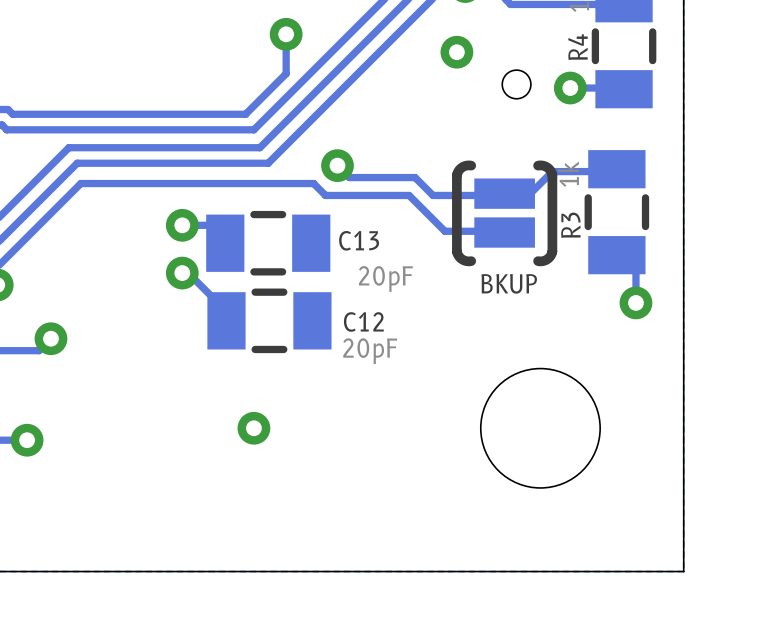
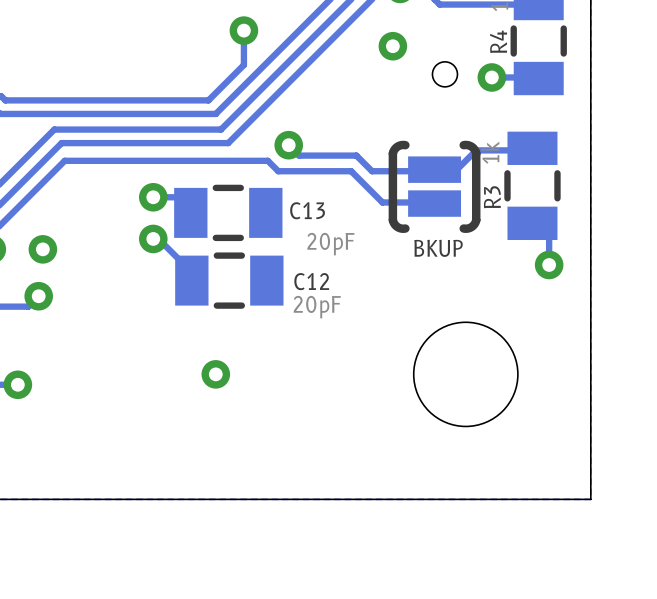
via: none -> (42, 249)

